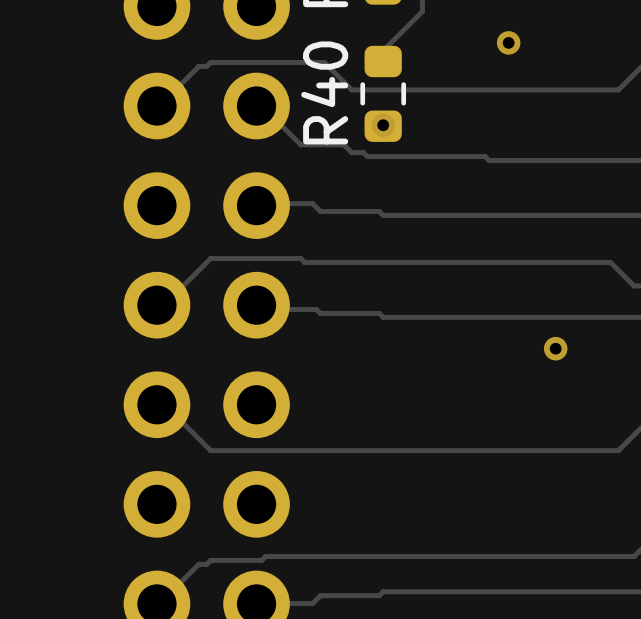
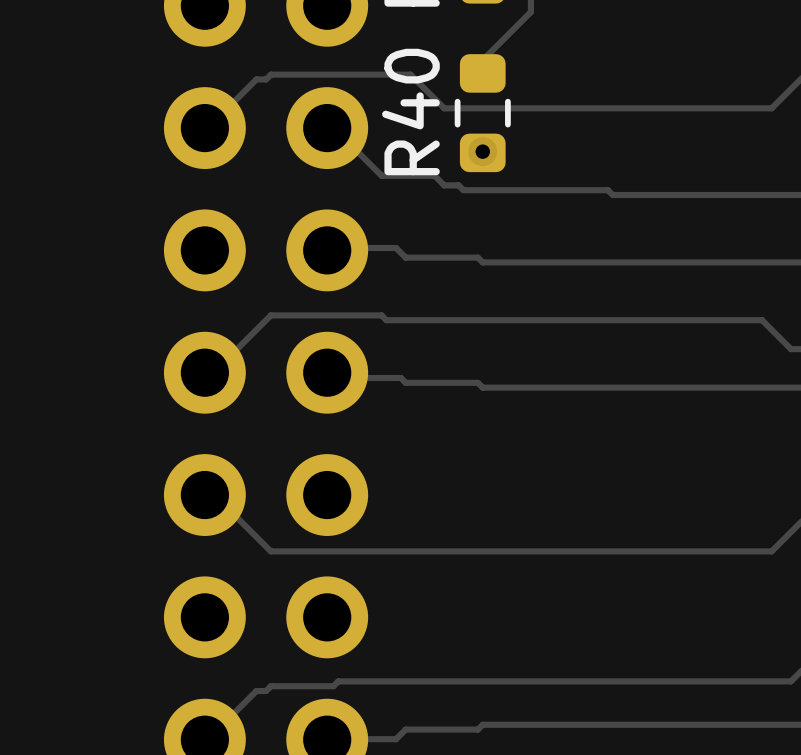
via: (508, 42) -> none
via: (555, 348) -> none

